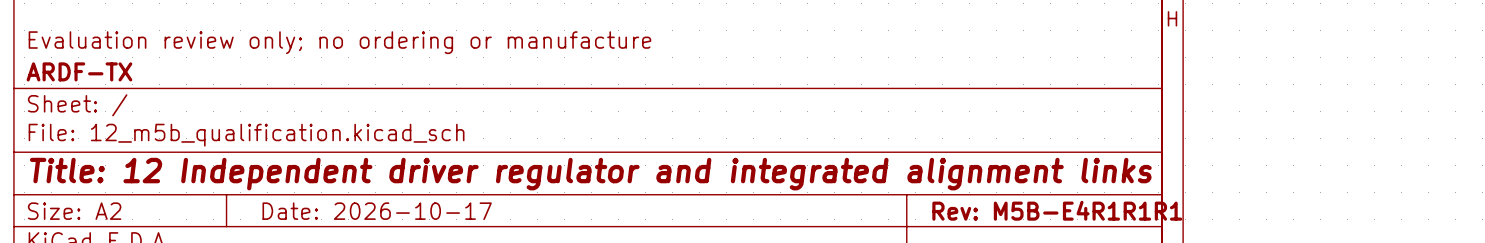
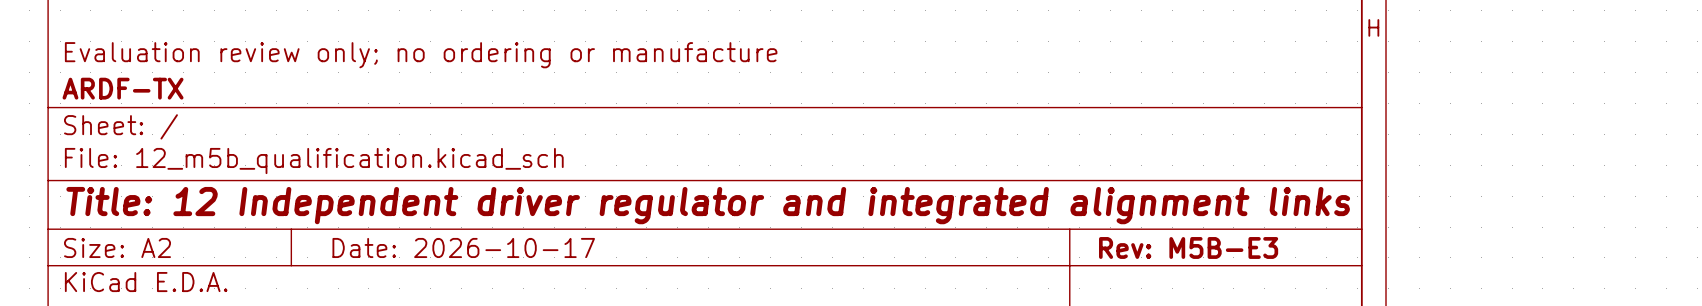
title block: Rev: M5B-E4R1R1R1 (1057, 210) -> Rev: M5B-E3 (1188, 247)

